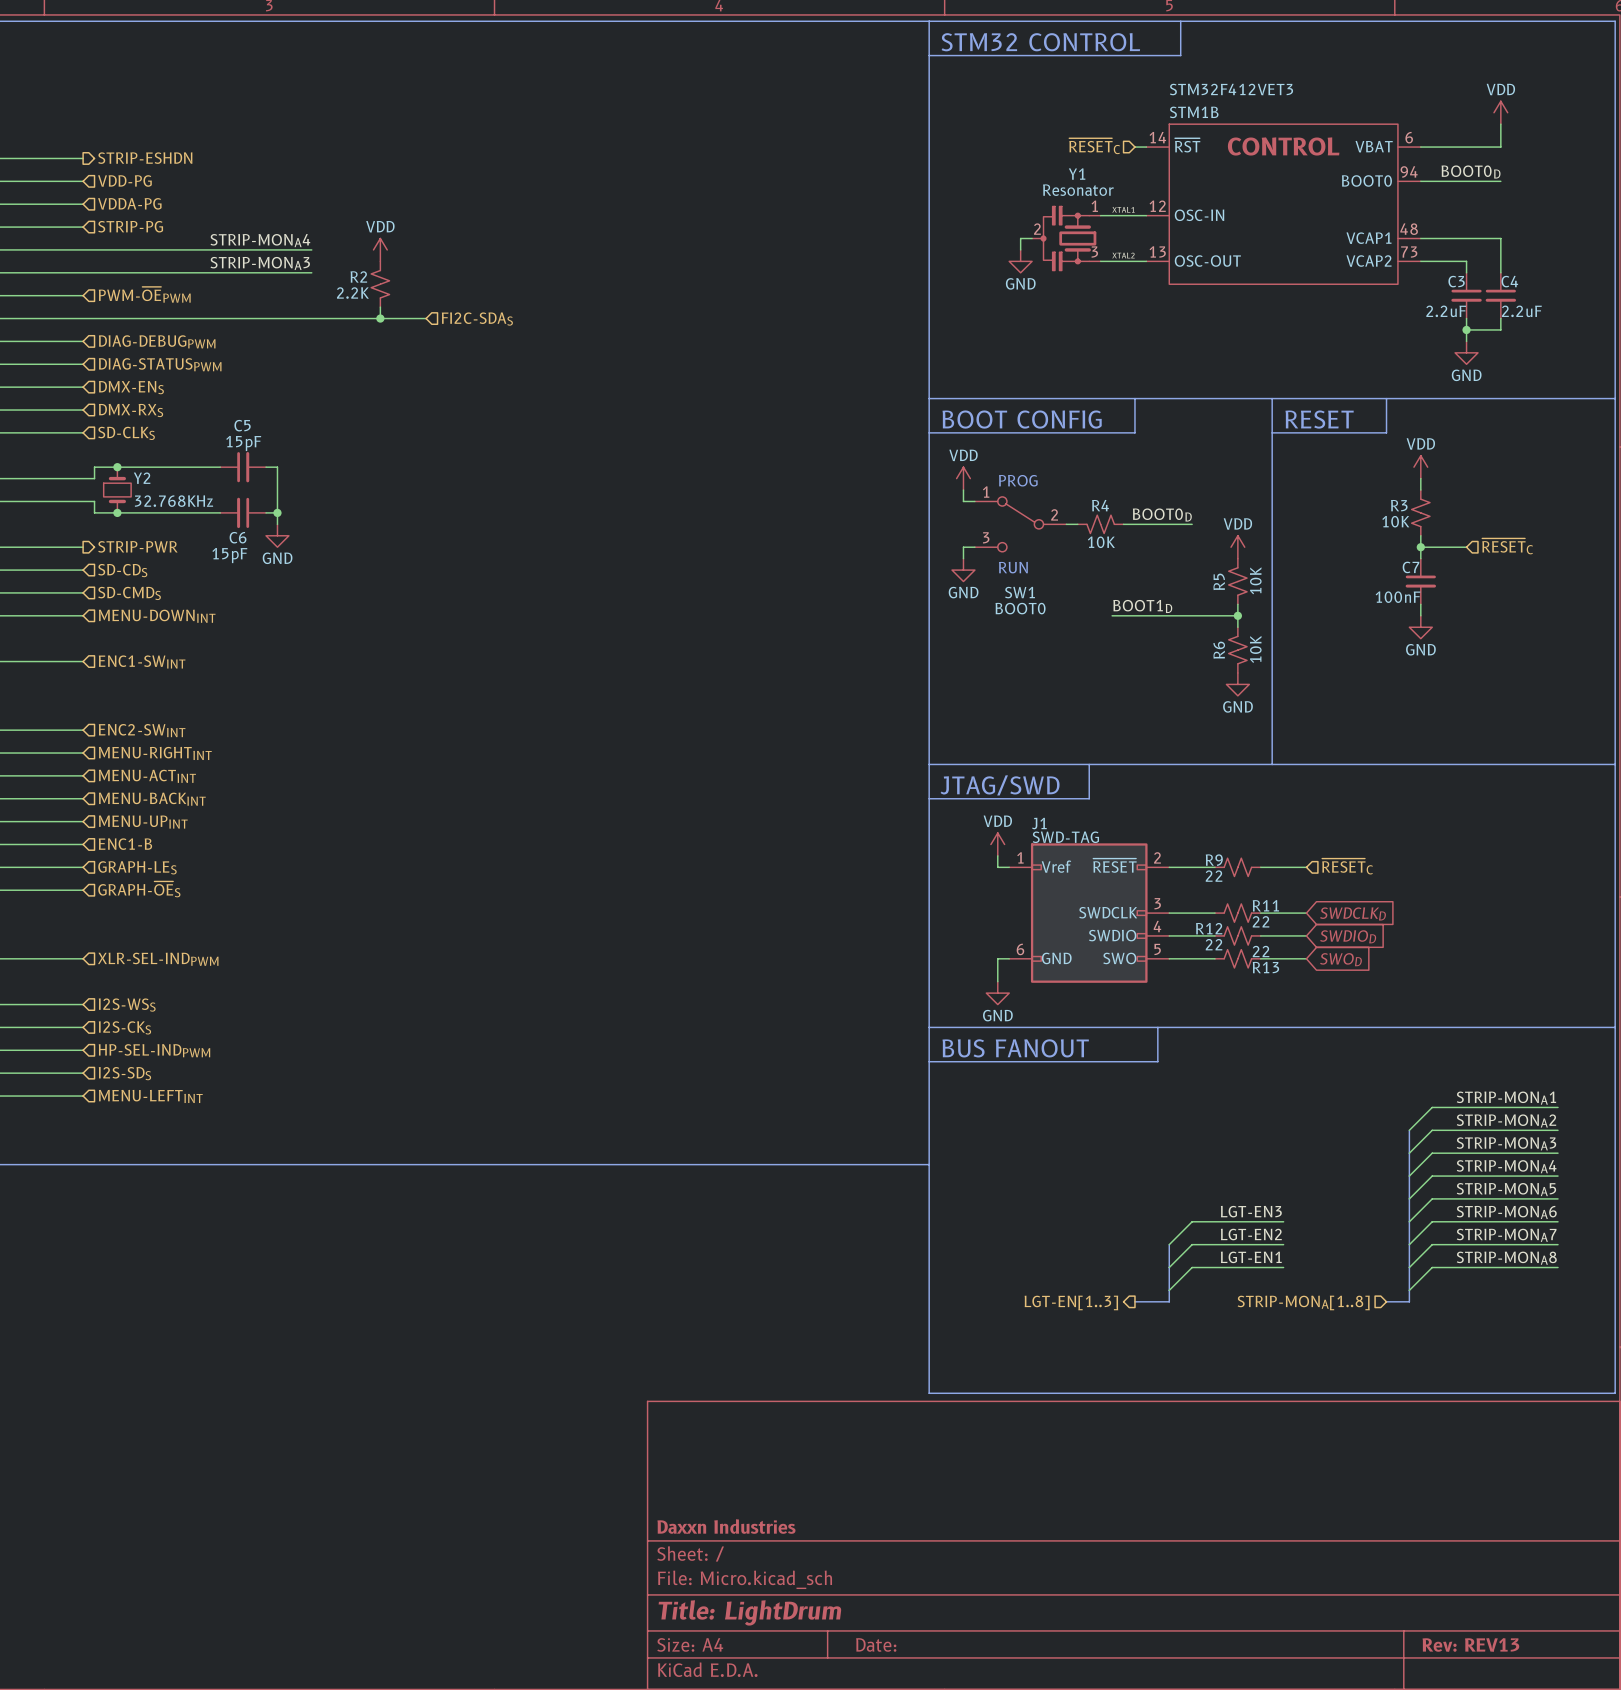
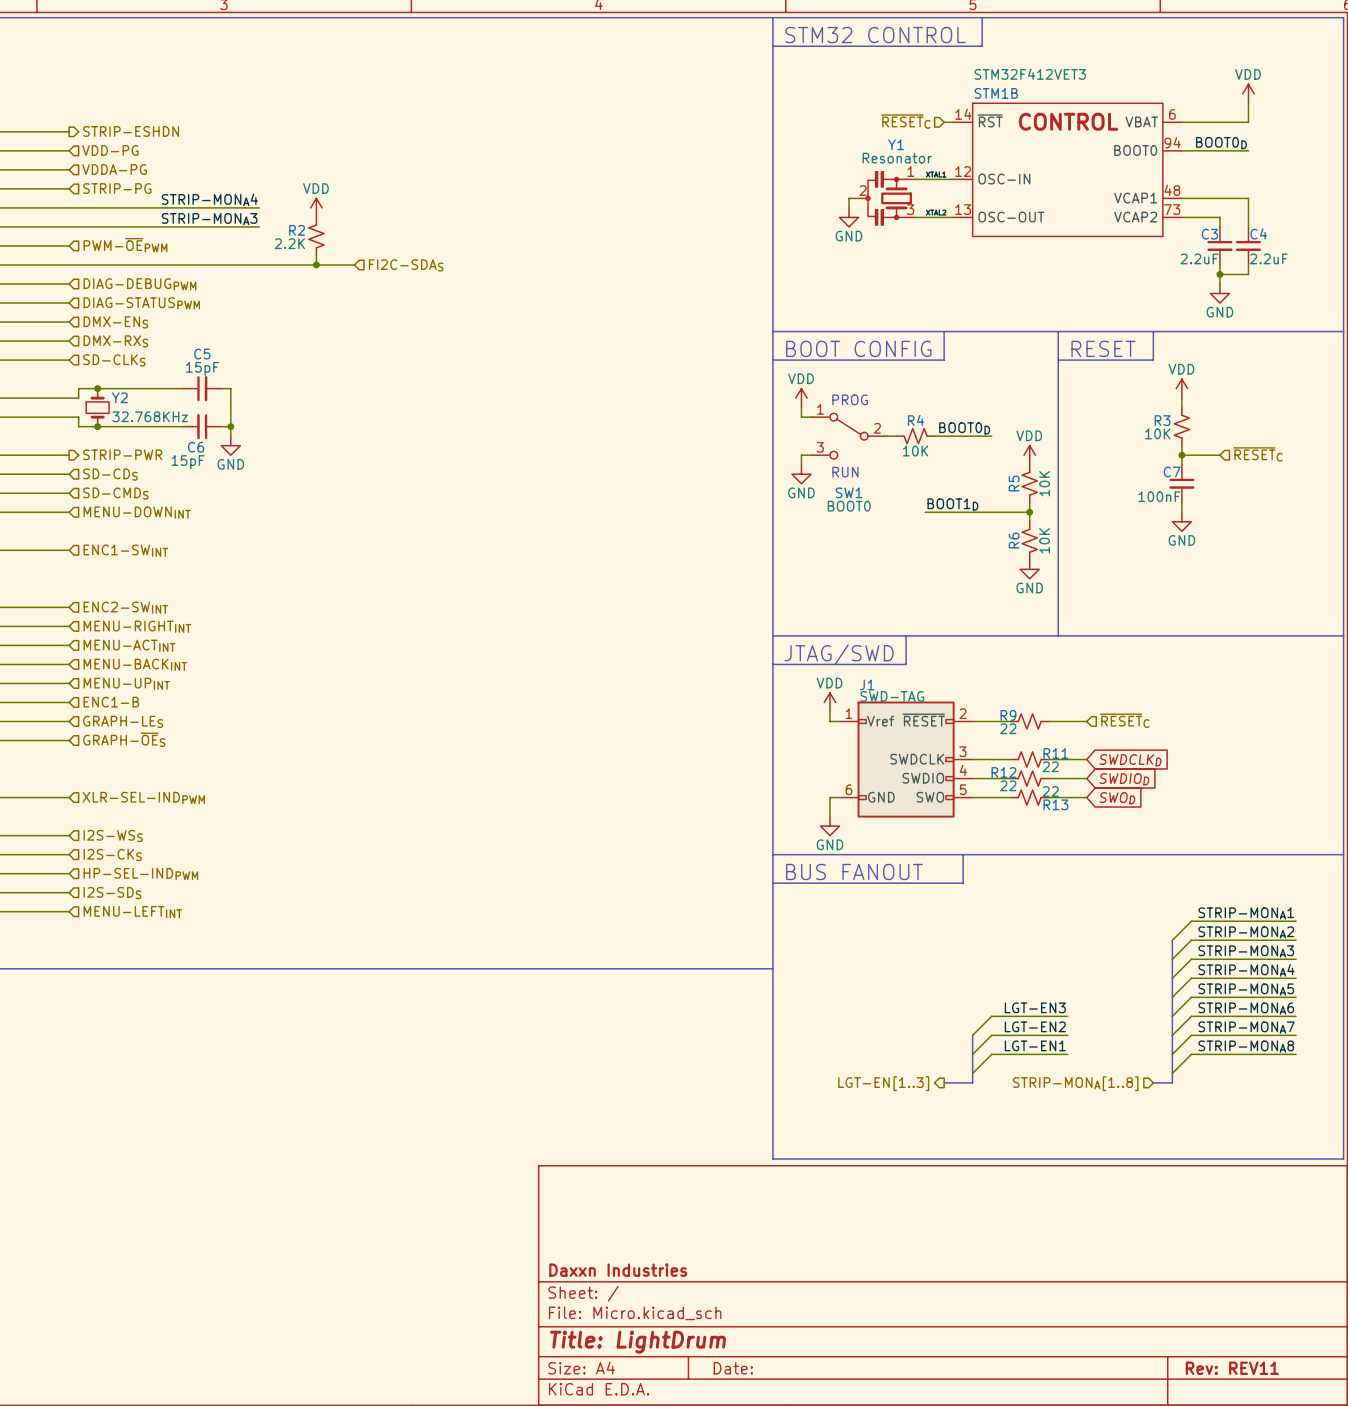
title block: Rev: REV13 (1470, 1644) -> Rev: REV11 (1232, 1368)

